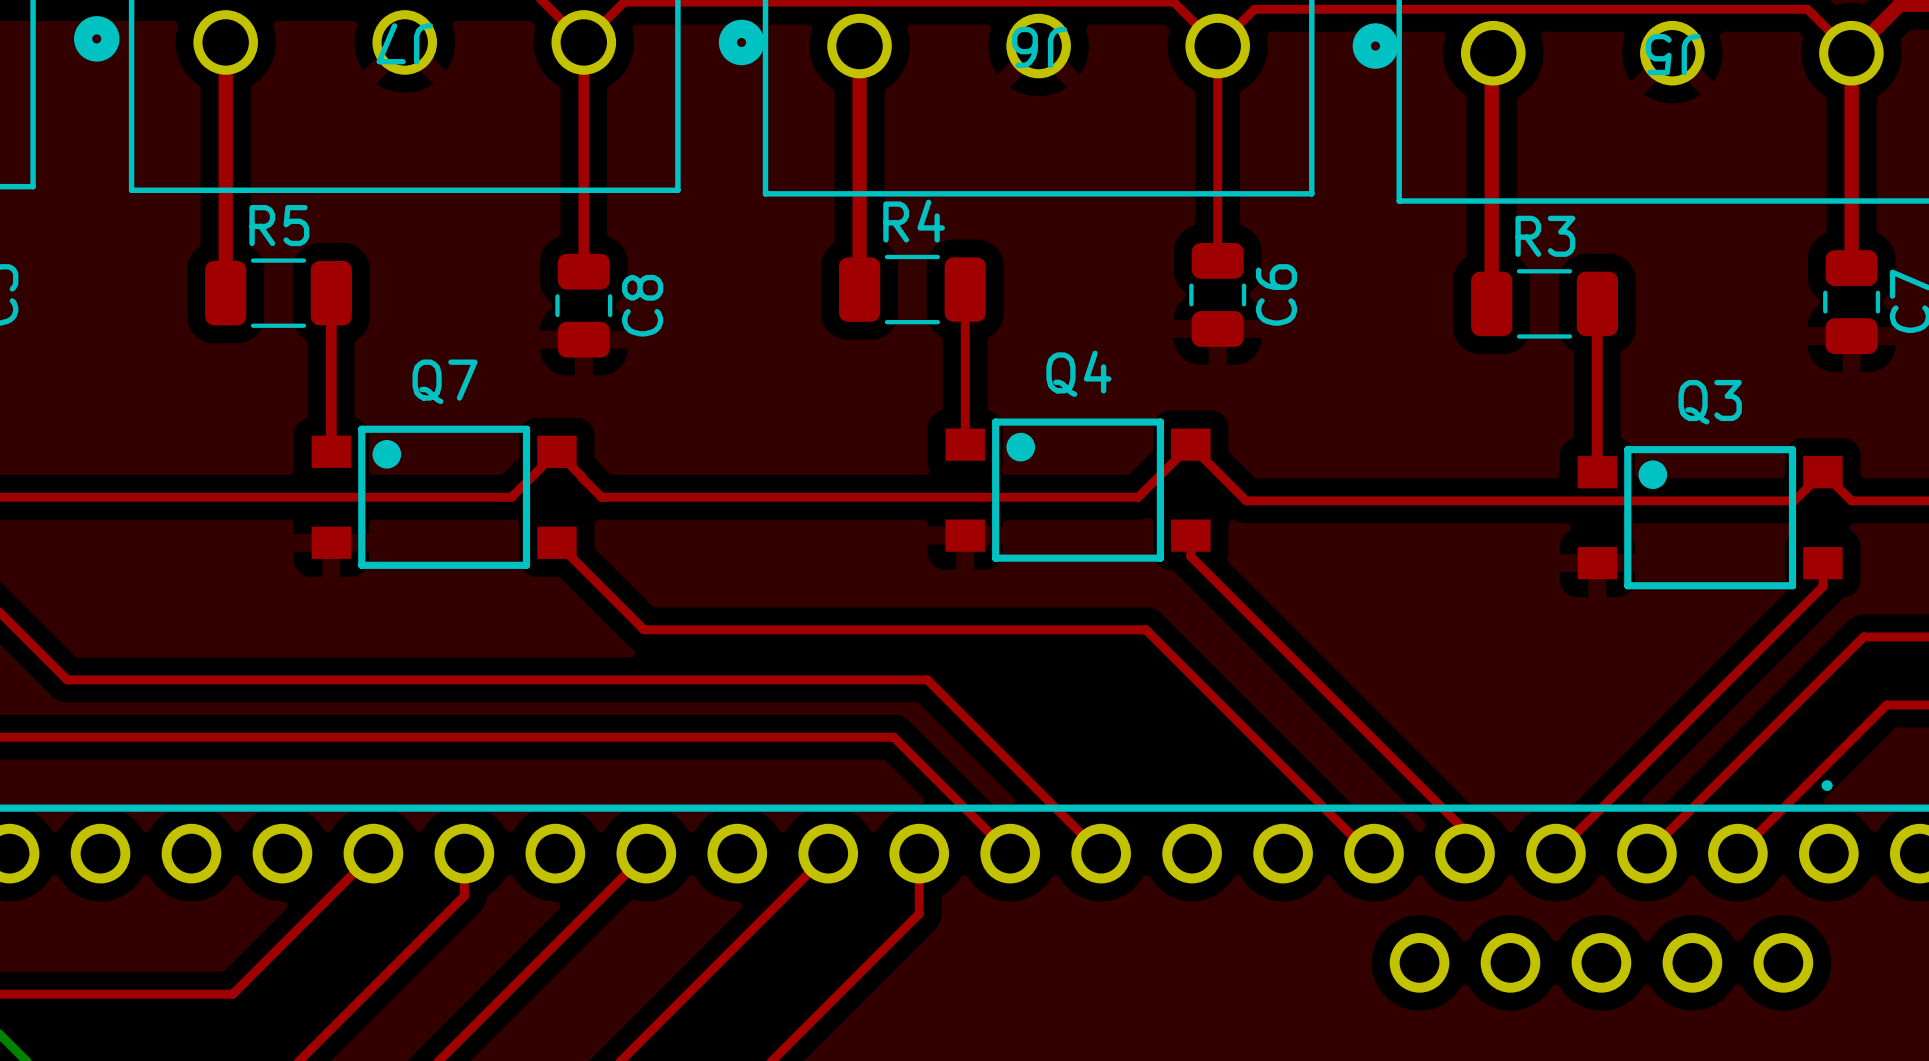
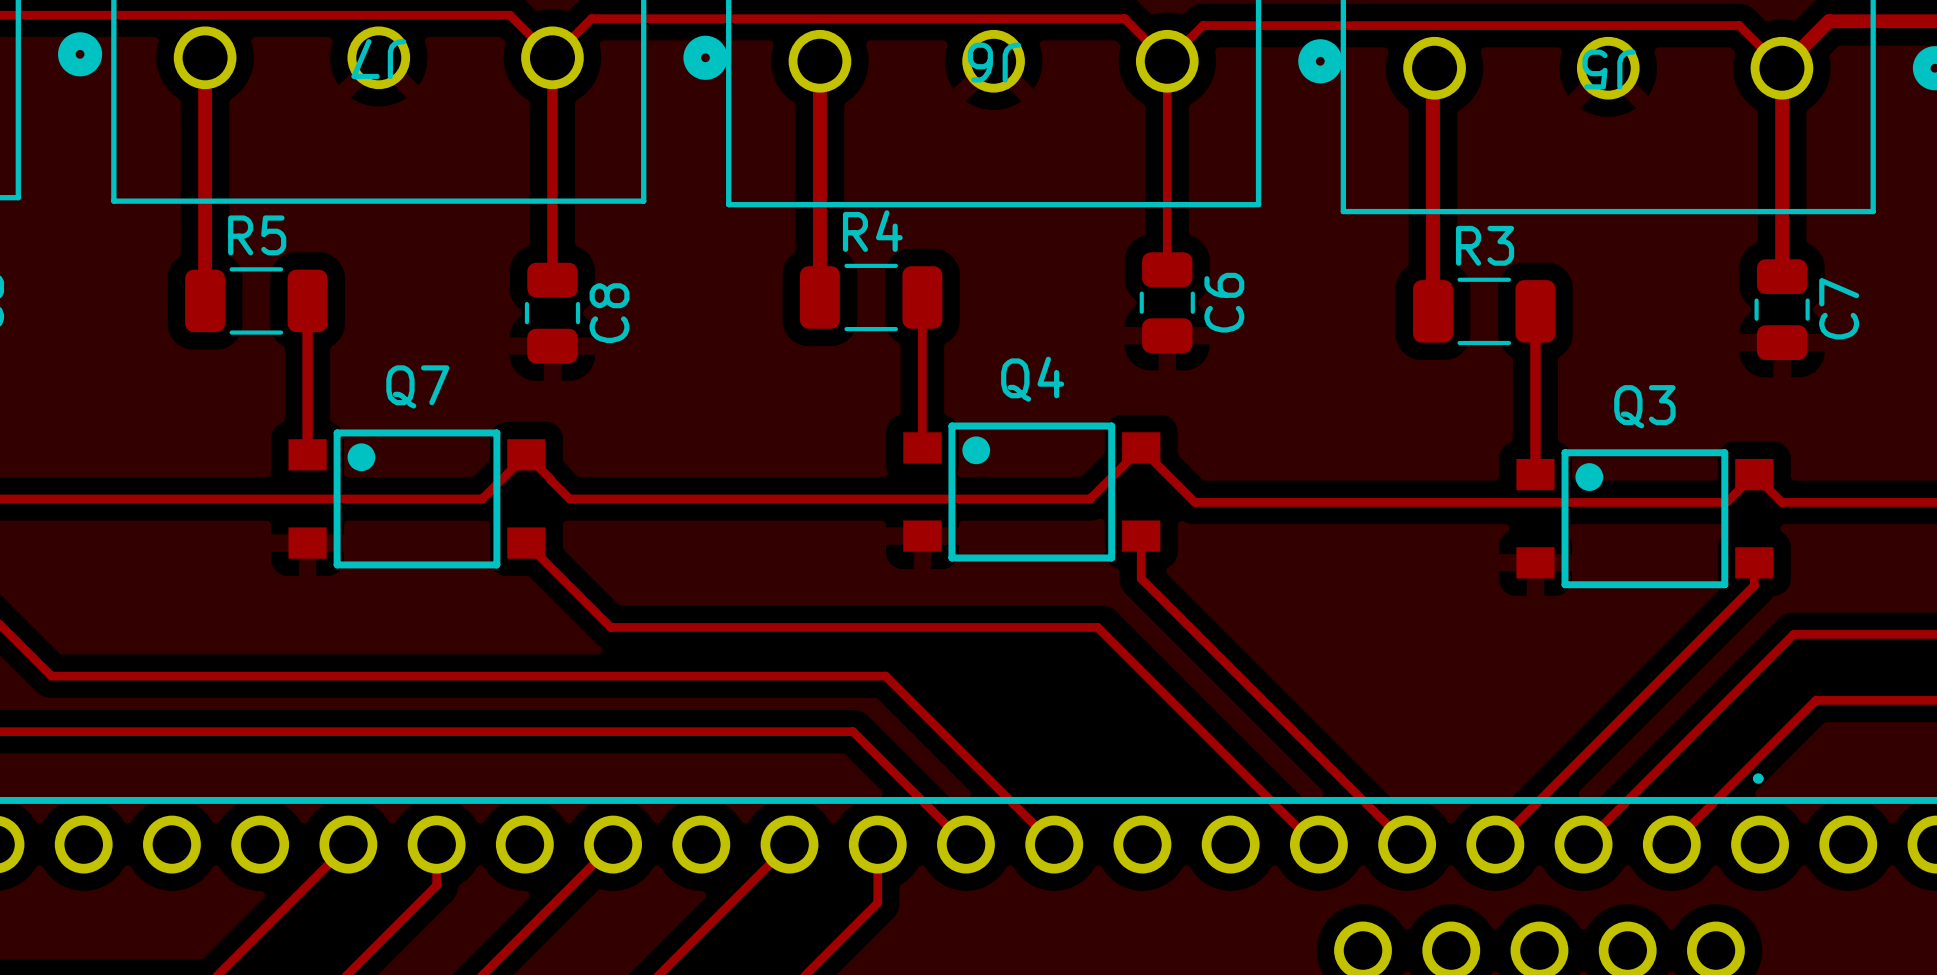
top track: (1190, 556) (1464, 830) (1464, 853) -> (1141, 556) (1141, 578) (1407, 844)

